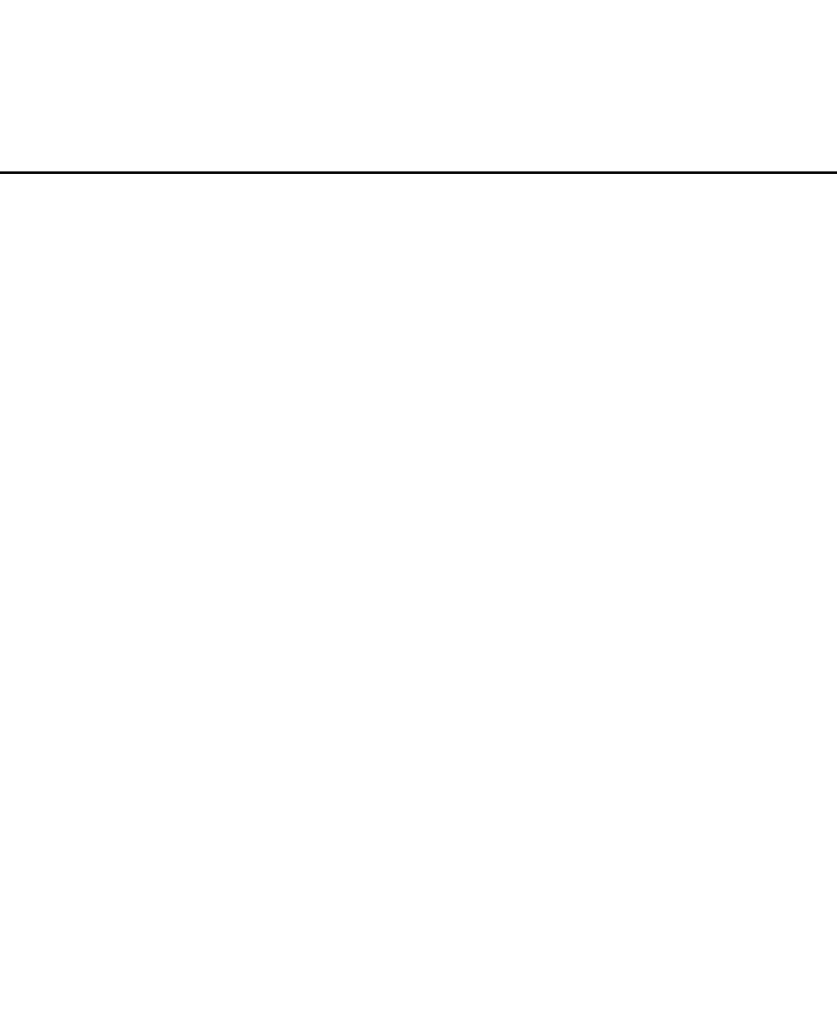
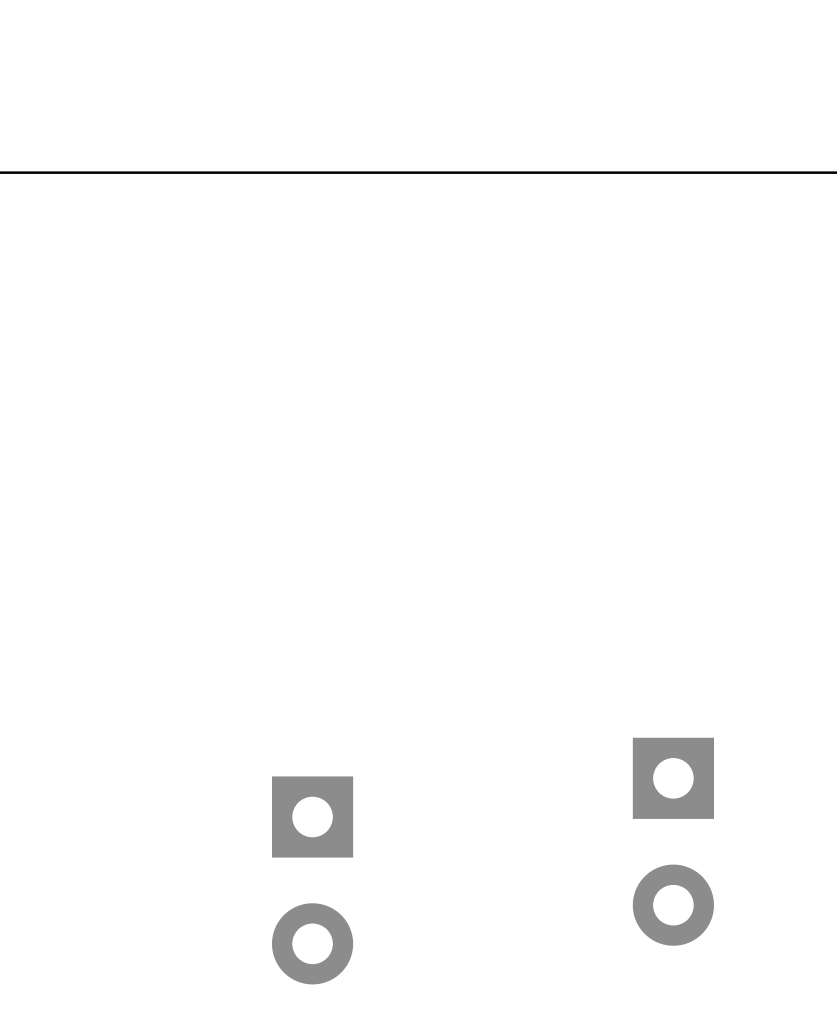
part: none -> (673, 841)
part: none -> (312, 880)

